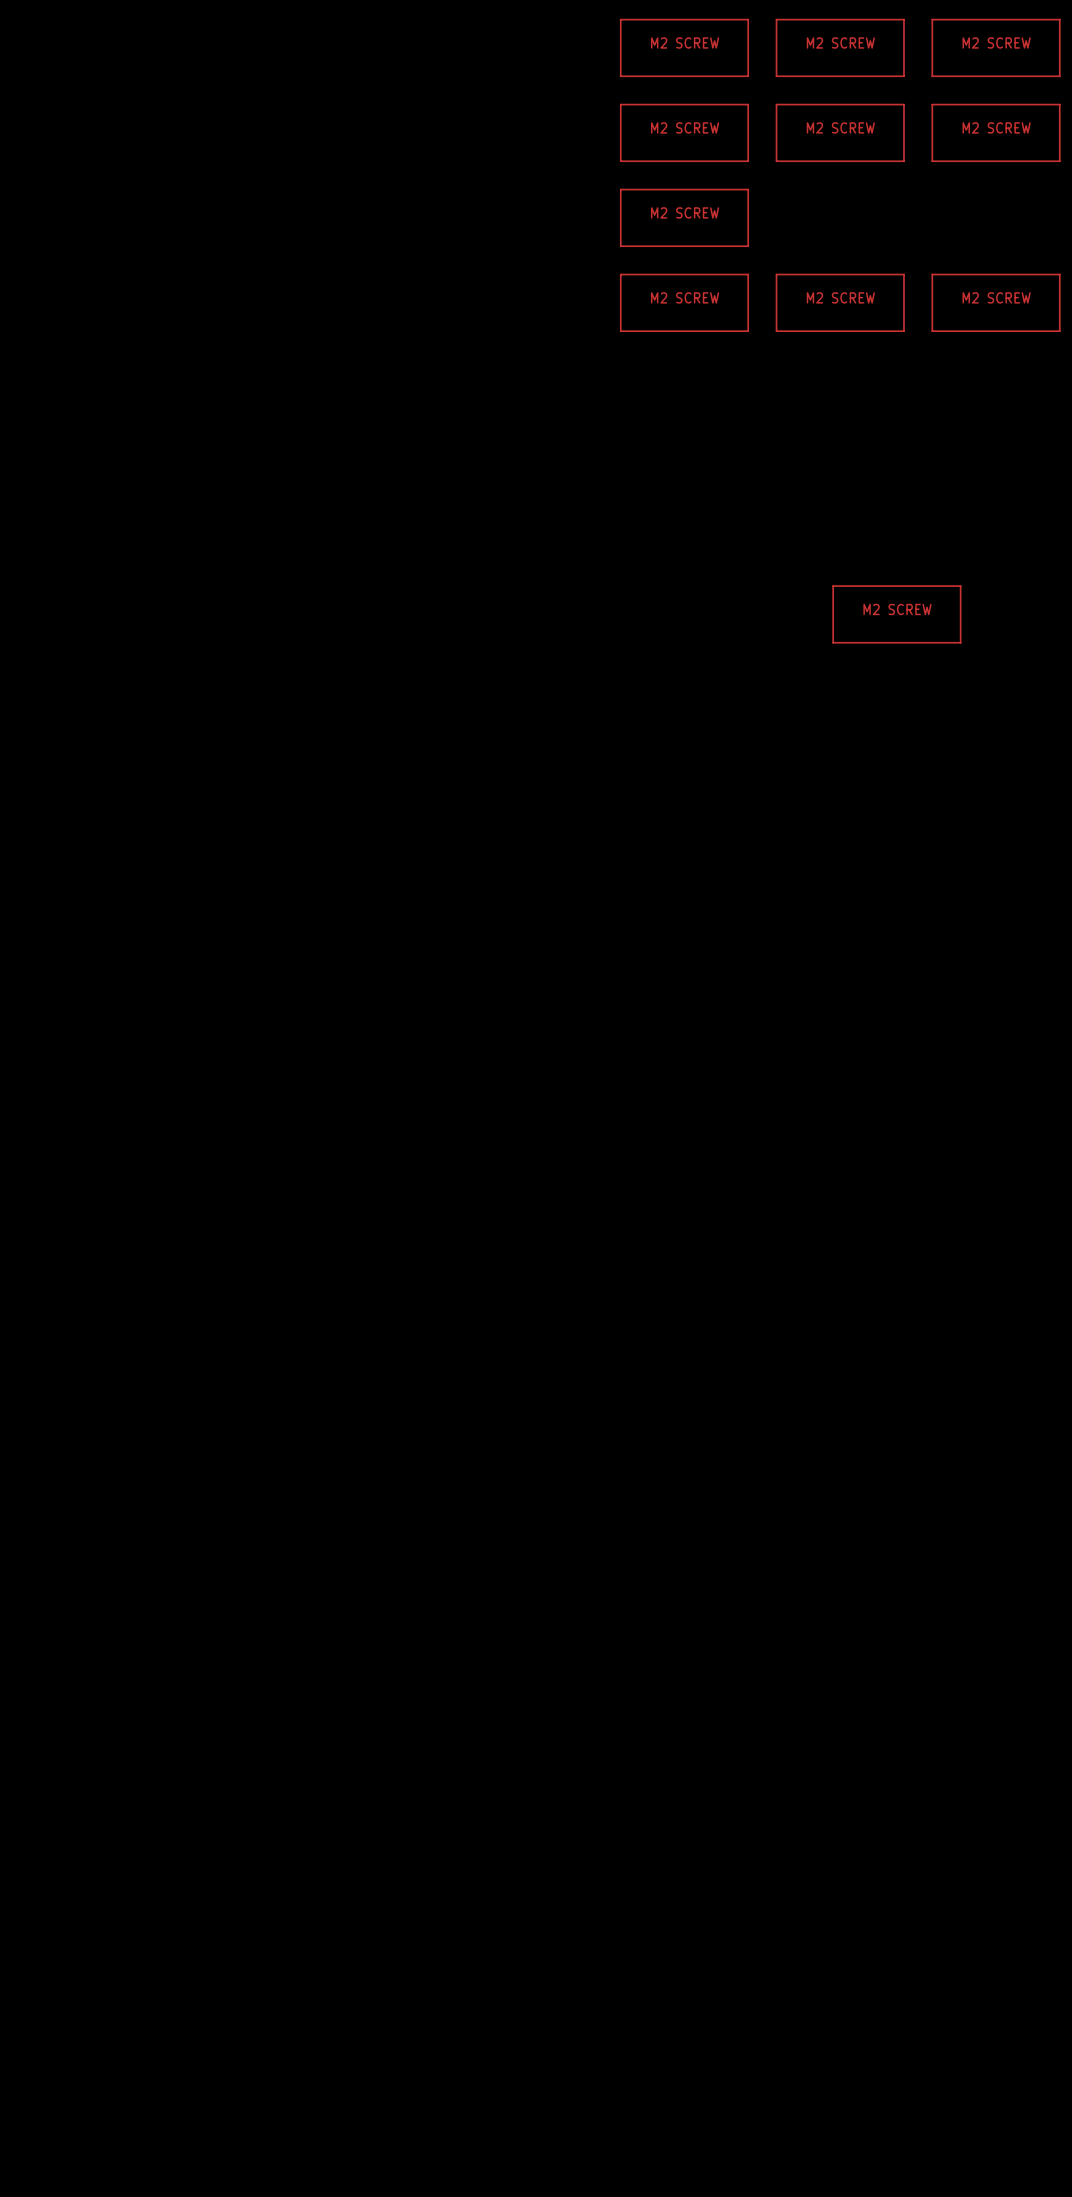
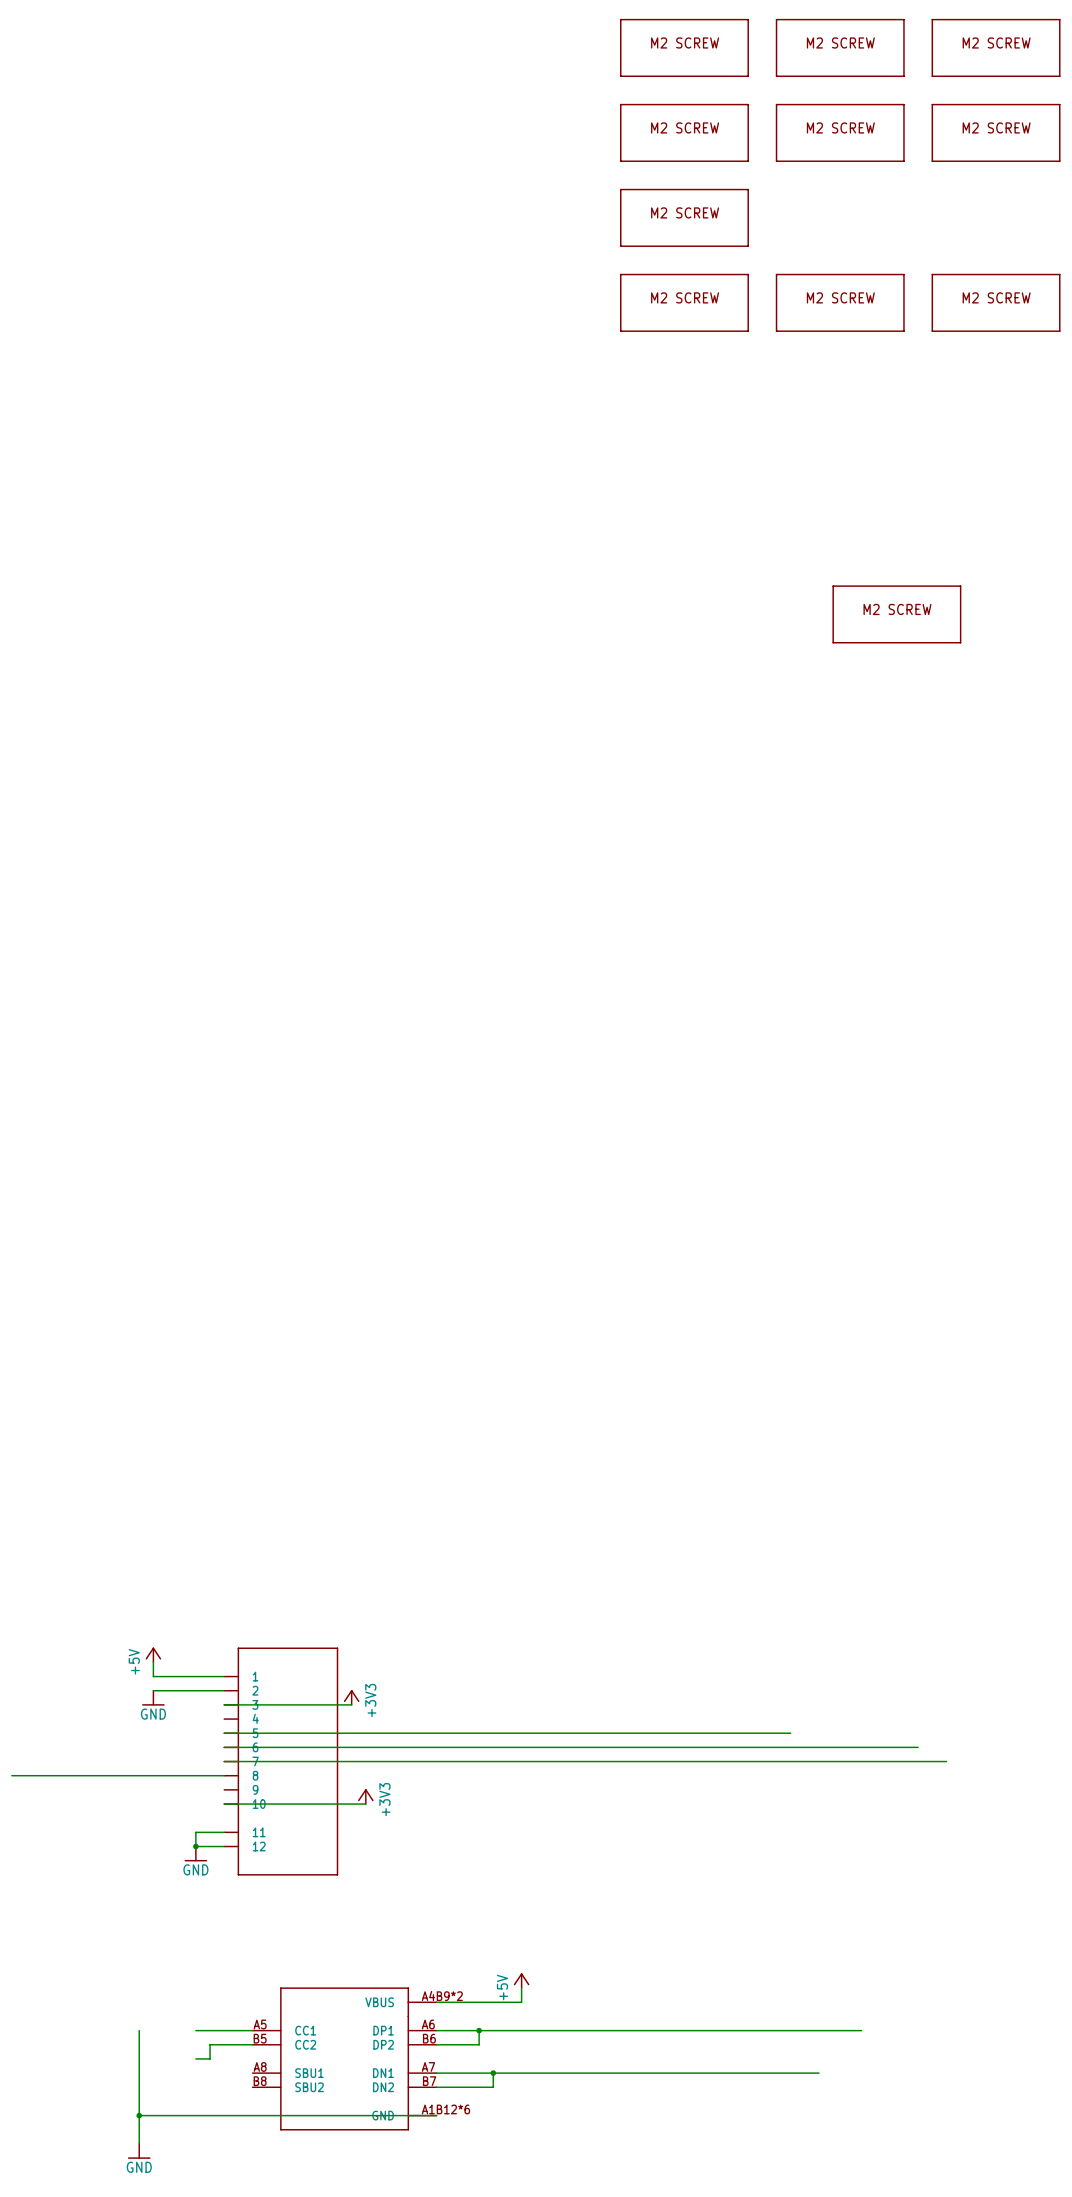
power symbol: none -> +5V (153, 1654)
wire: none -> (153, 1662) (153, 1676) (224, 1676)
wire: none -> (153, 1690) (224, 1690)
power symbol: none -> +3V3 (351, 1697)
power symbol: none -> GND (153, 1698)
wire: none -> (224, 1704) (351, 1704)
wire: none -> (224, 1733) (790, 1733)
wire: none -> (224, 1747) (918, 1747)
wire: none -> (224, 1761) (946, 1761)
part: none -> (281, 1761)
wire: none -> (11, 1775) (224, 1775)
power symbol: none -> +3V3 (365, 1796)
wire: none -> (224, 1804) (365, 1804)
wire: none -> (224, 1832) (195, 1832) (195, 1846) (224, 1846)
junction: none -> (195, 1846)
power symbol: none -> GND (195, 1853)
power symbol: none -> +5V (521, 1980)
wire: none -> (521, 1988) (521, 2002) (436, 2002)
wire: none -> (139, 2030) (139, 2143)
wire: none -> (195, 2030) (252, 2030)
wire: none -> (436, 2030) (861, 2030)
wire: none -> (479, 2030) (479, 2044) (436, 2044)
junction: none -> (479, 2030)
wire: none -> (252, 2044) (210, 2044) (210, 2058) (195, 2058)
part: none -> (344, 2058)
wire: none -> (436, 2073) (819, 2073)
wire: none -> (493, 2073) (493, 2087) (436, 2087)
junction: none -> (493, 2073)
wire: none -> (139, 2115) (436, 2115)
junction: none -> (139, 2115)
power symbol: none -> GND (139, 2151)

